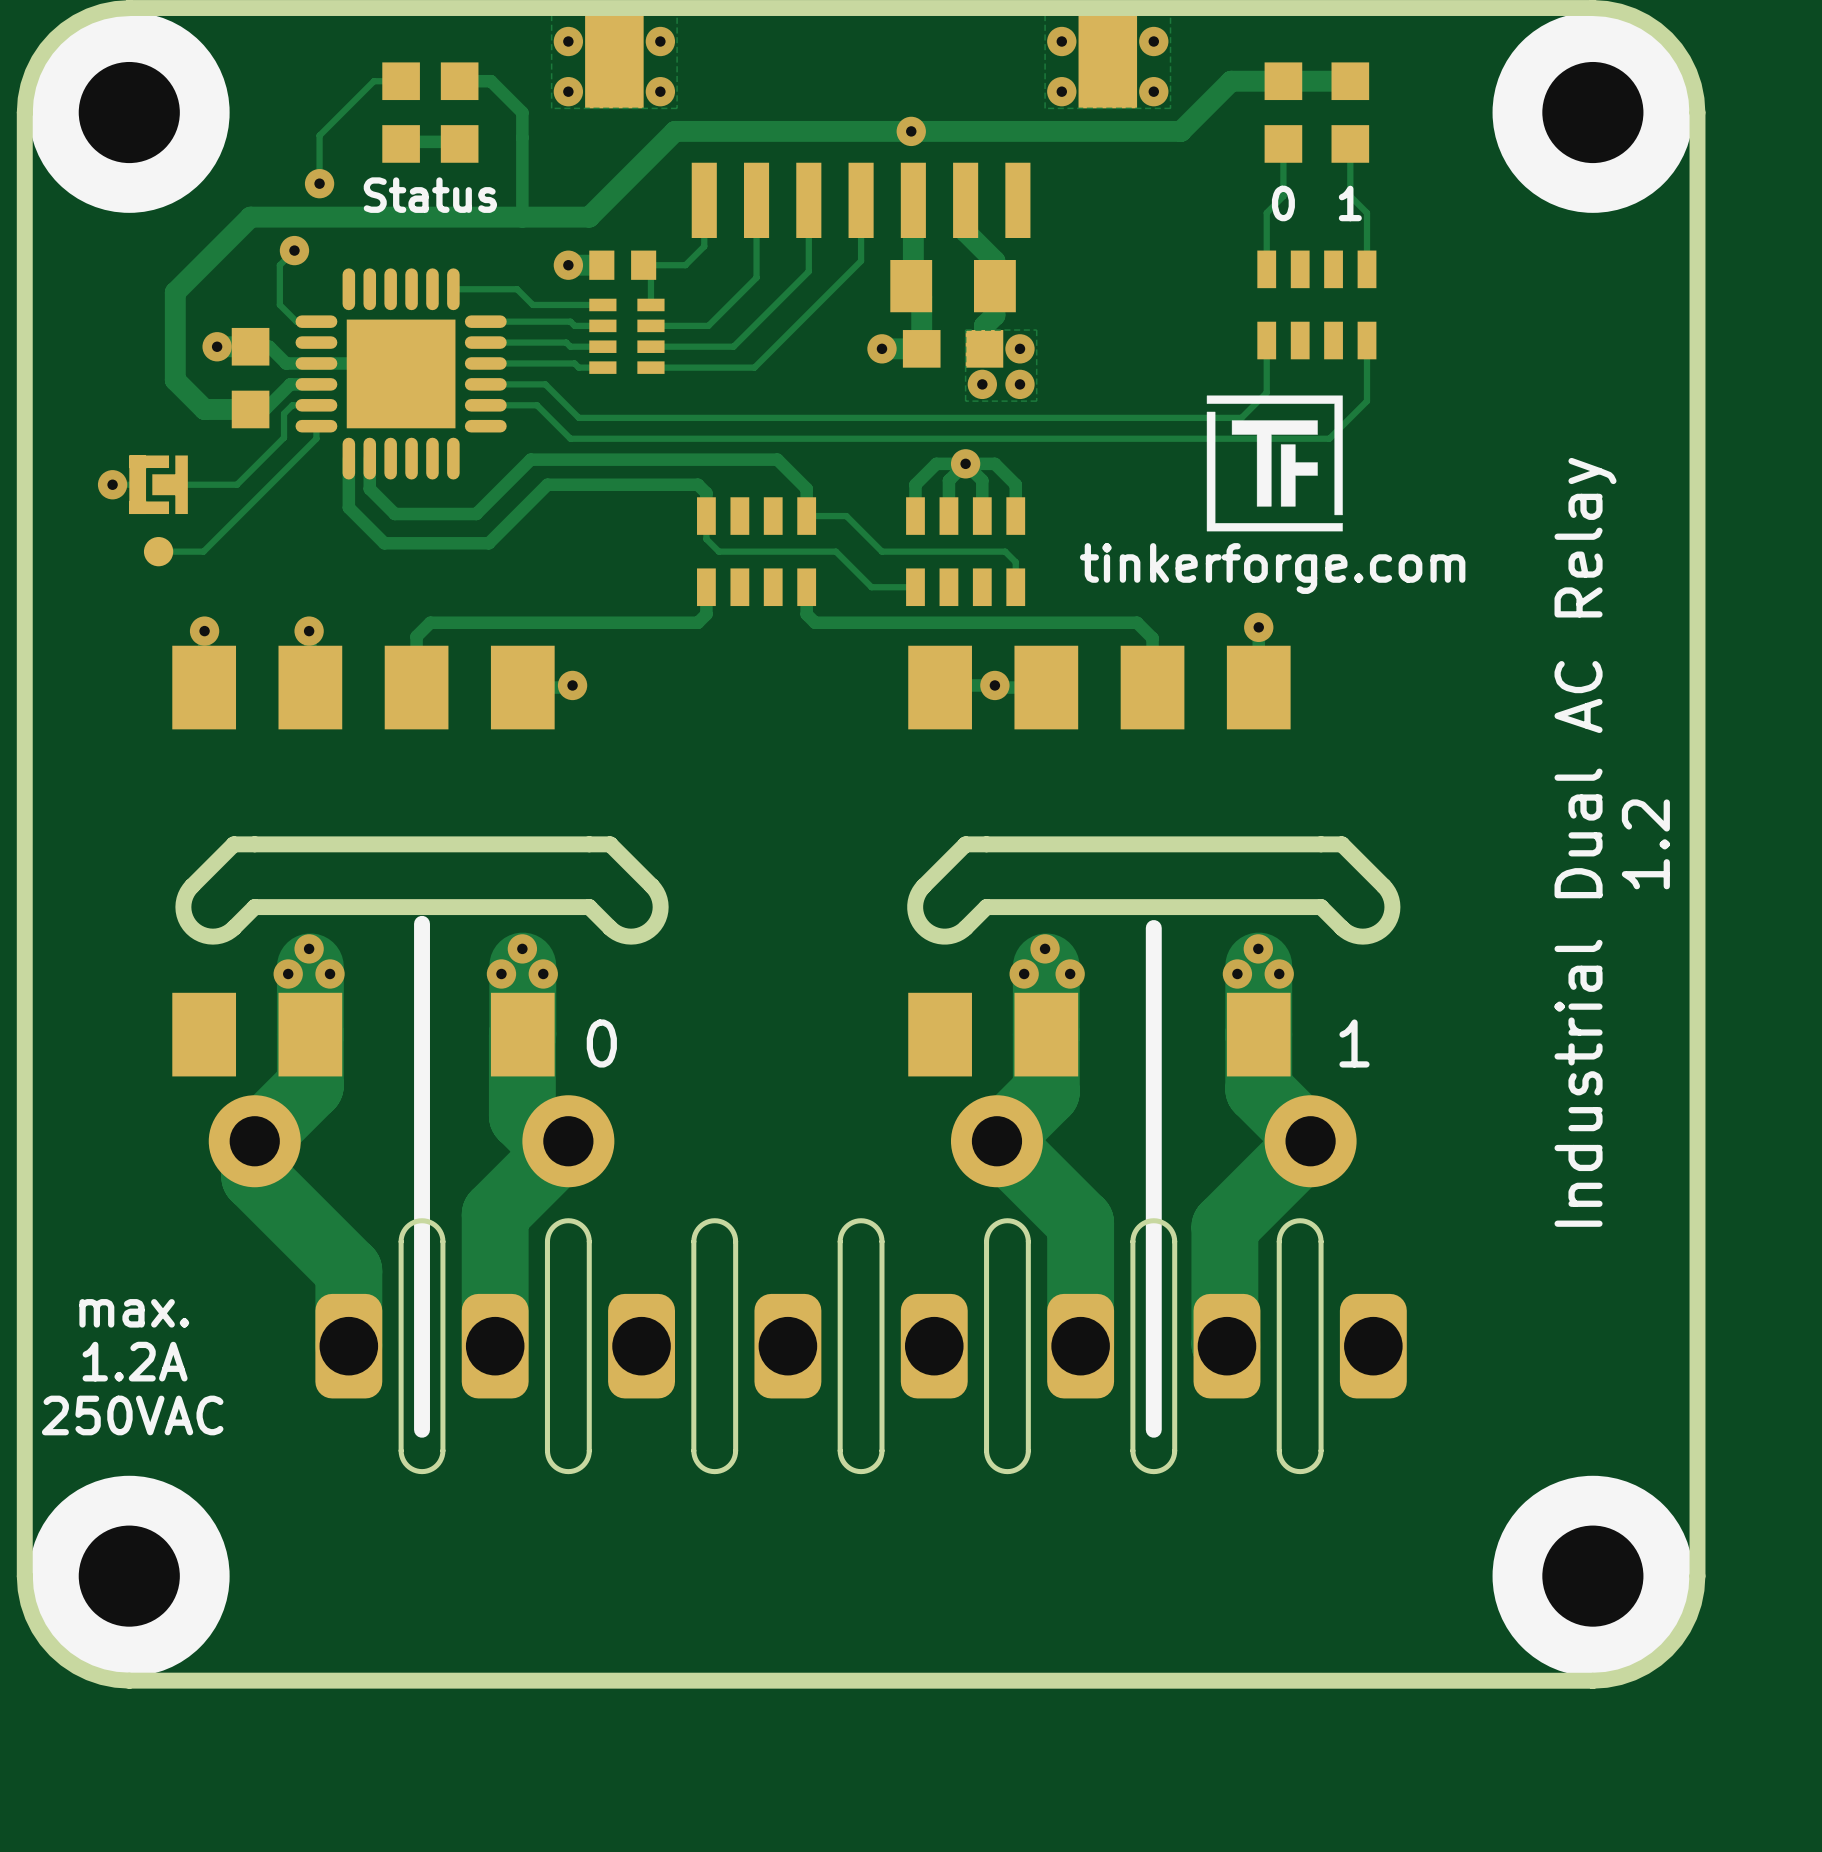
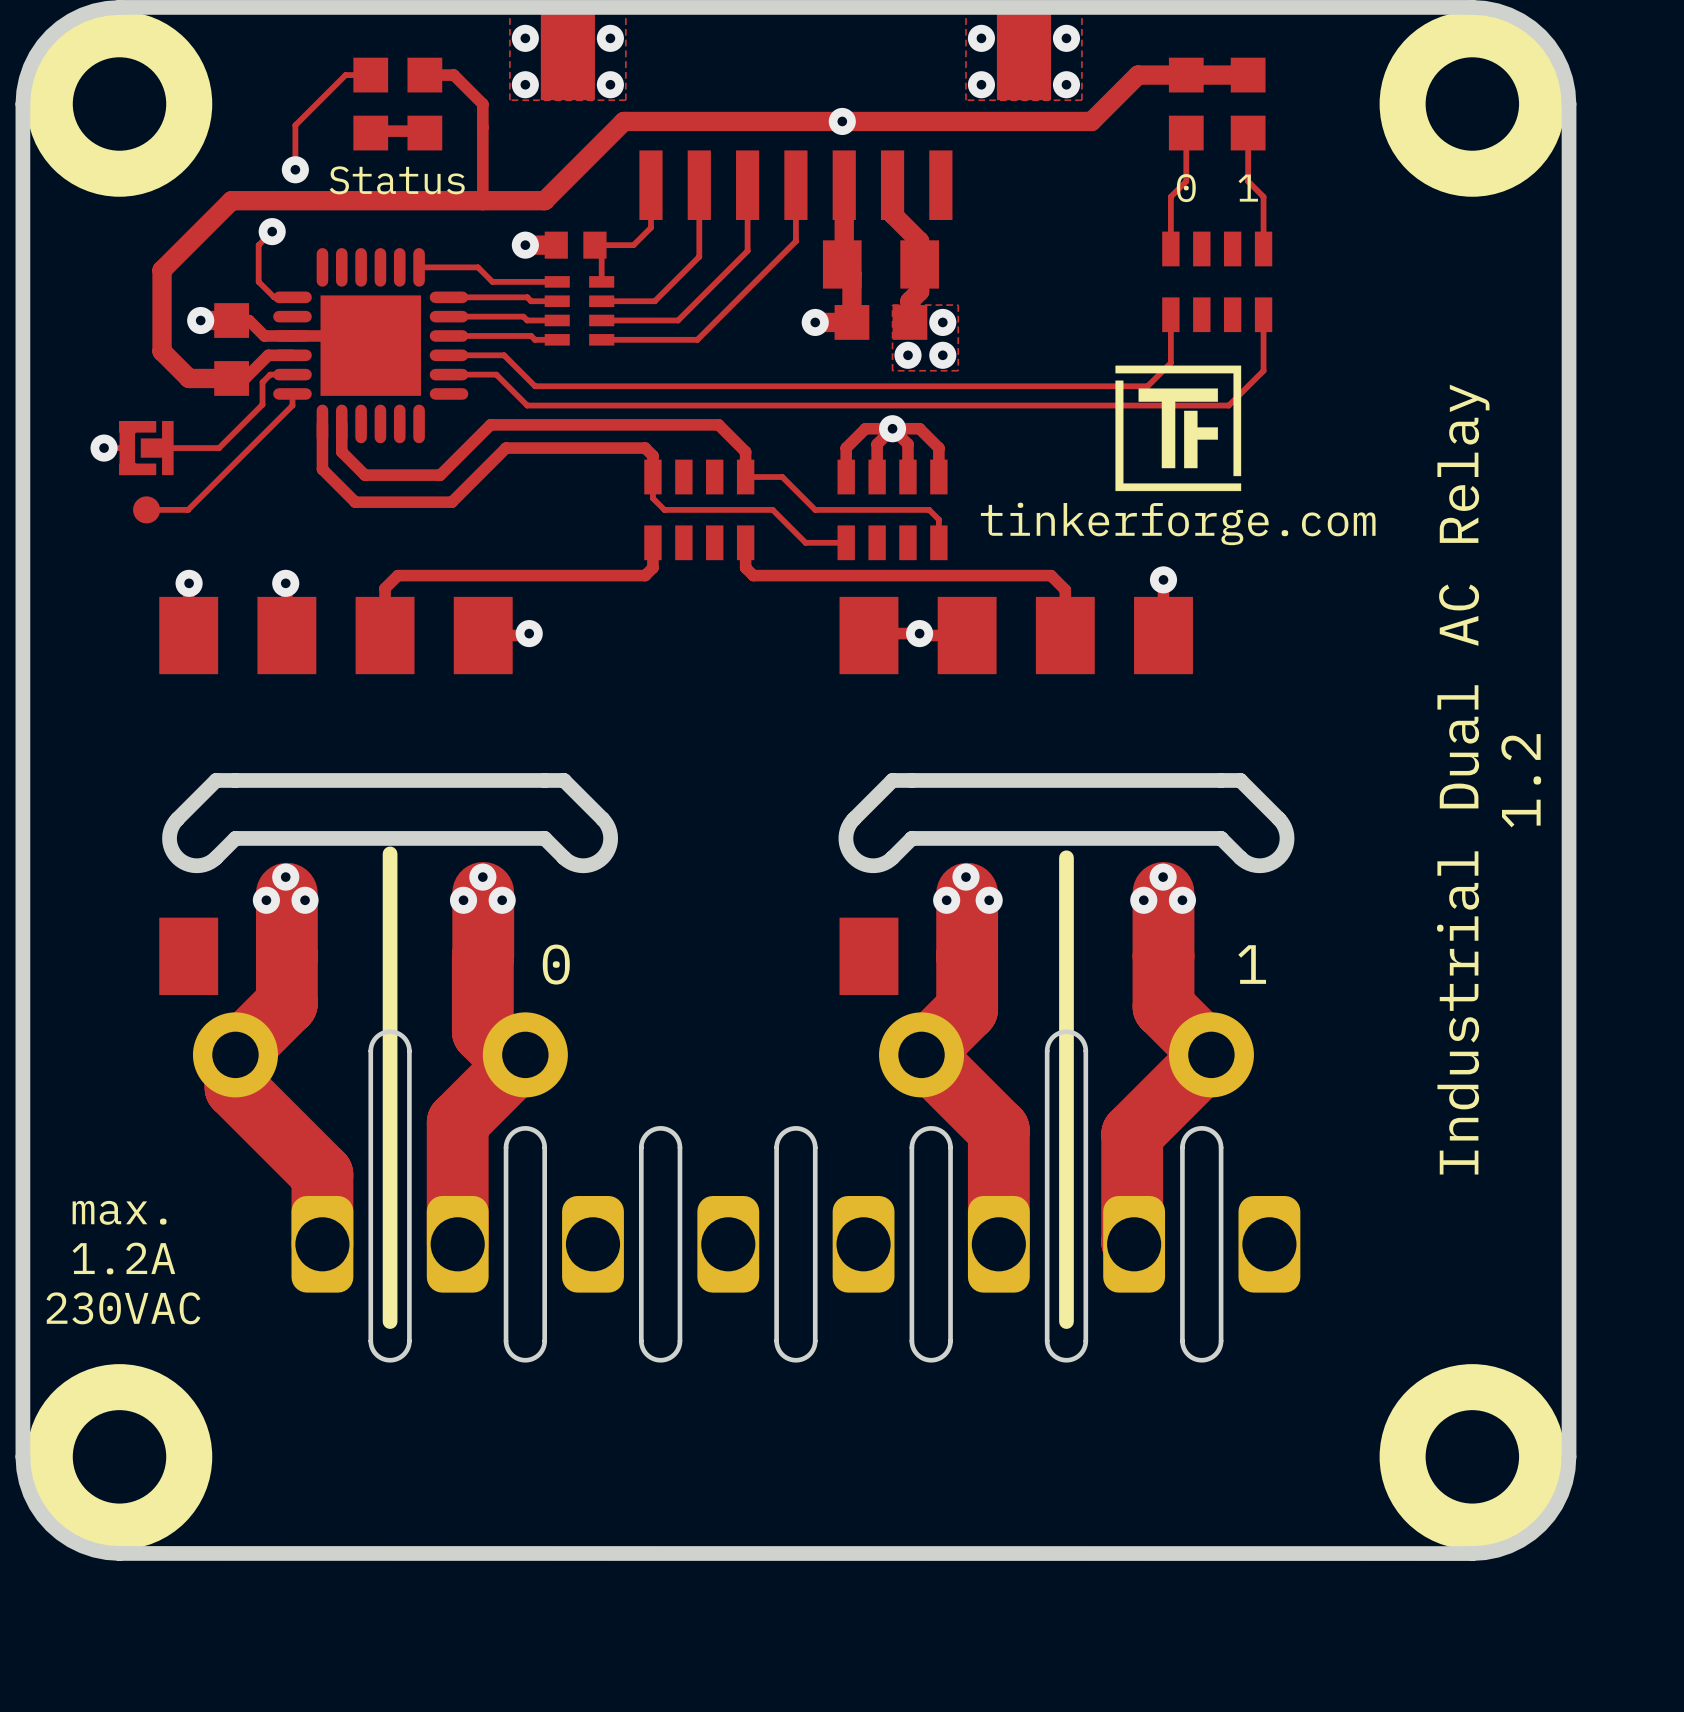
part: none -> (795, 1195)
part: (861, 1346) -> none
text: 250VAC (132, 1415) -> 230VAC (123, 1308)

